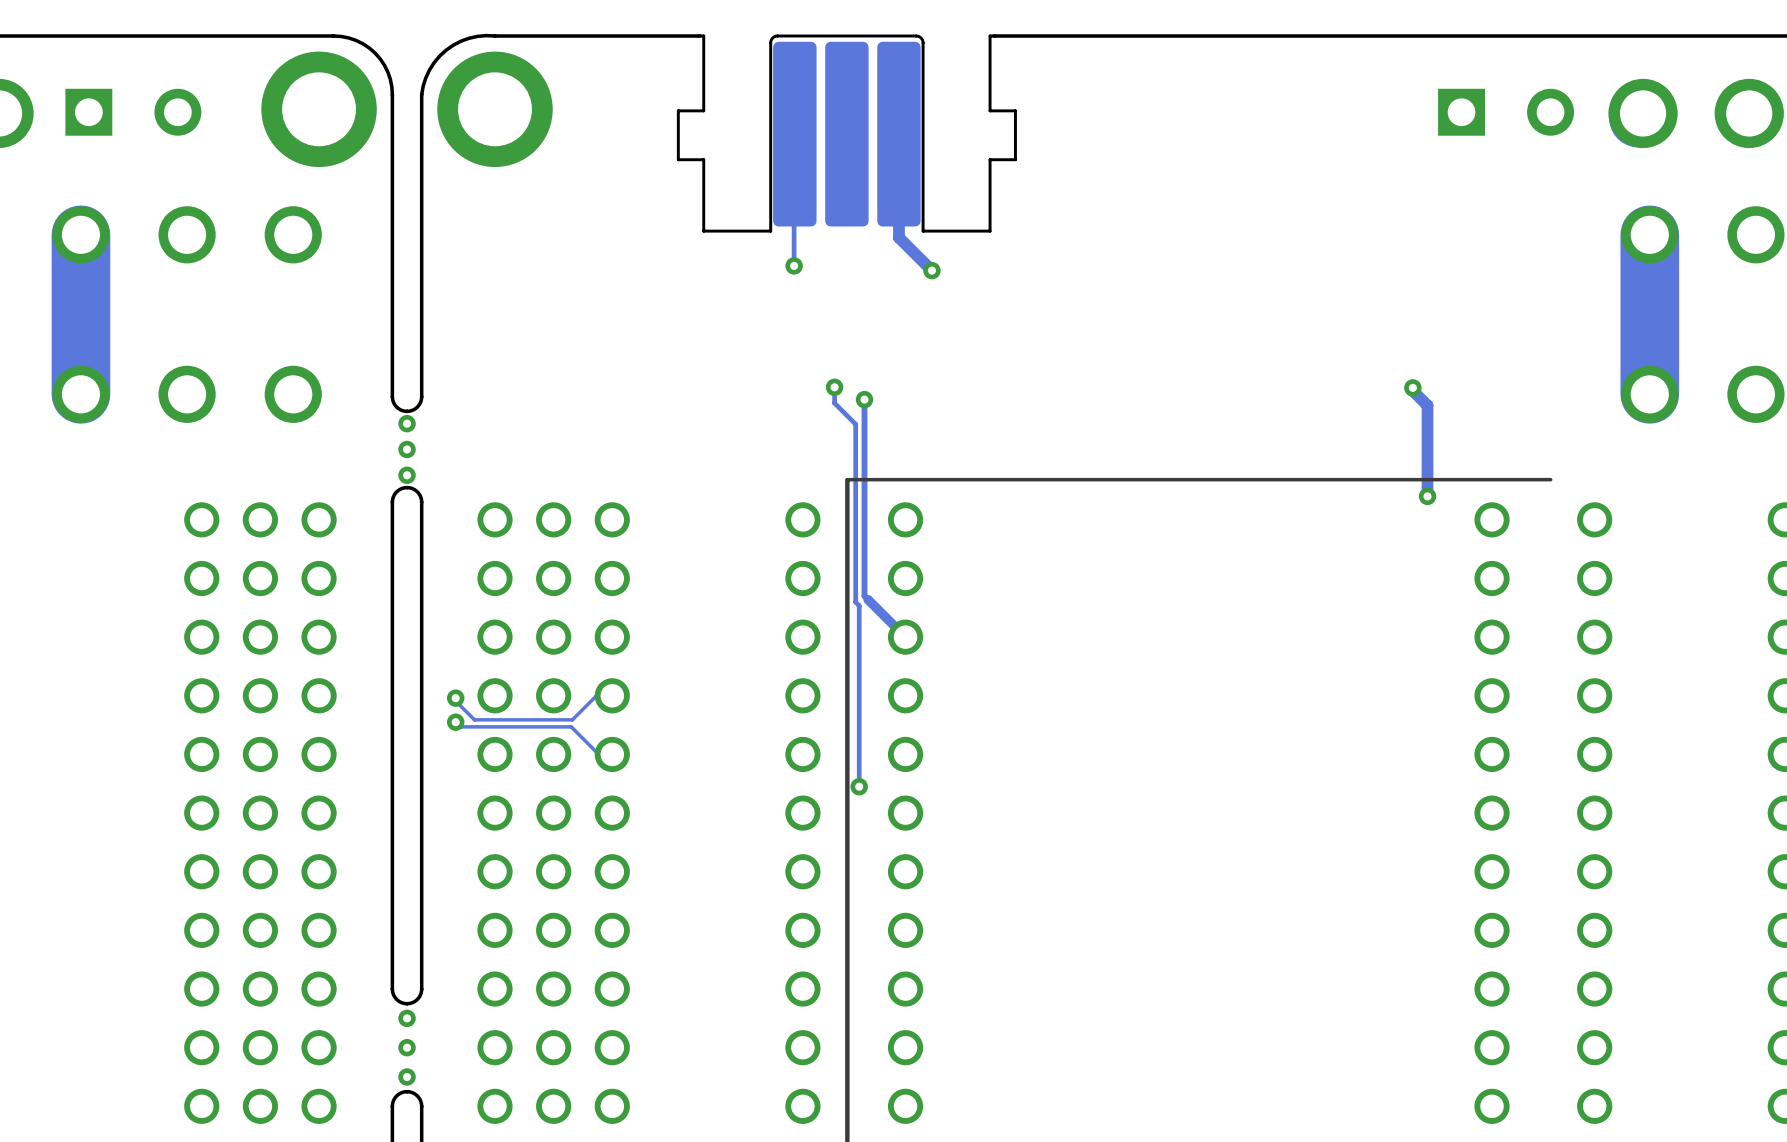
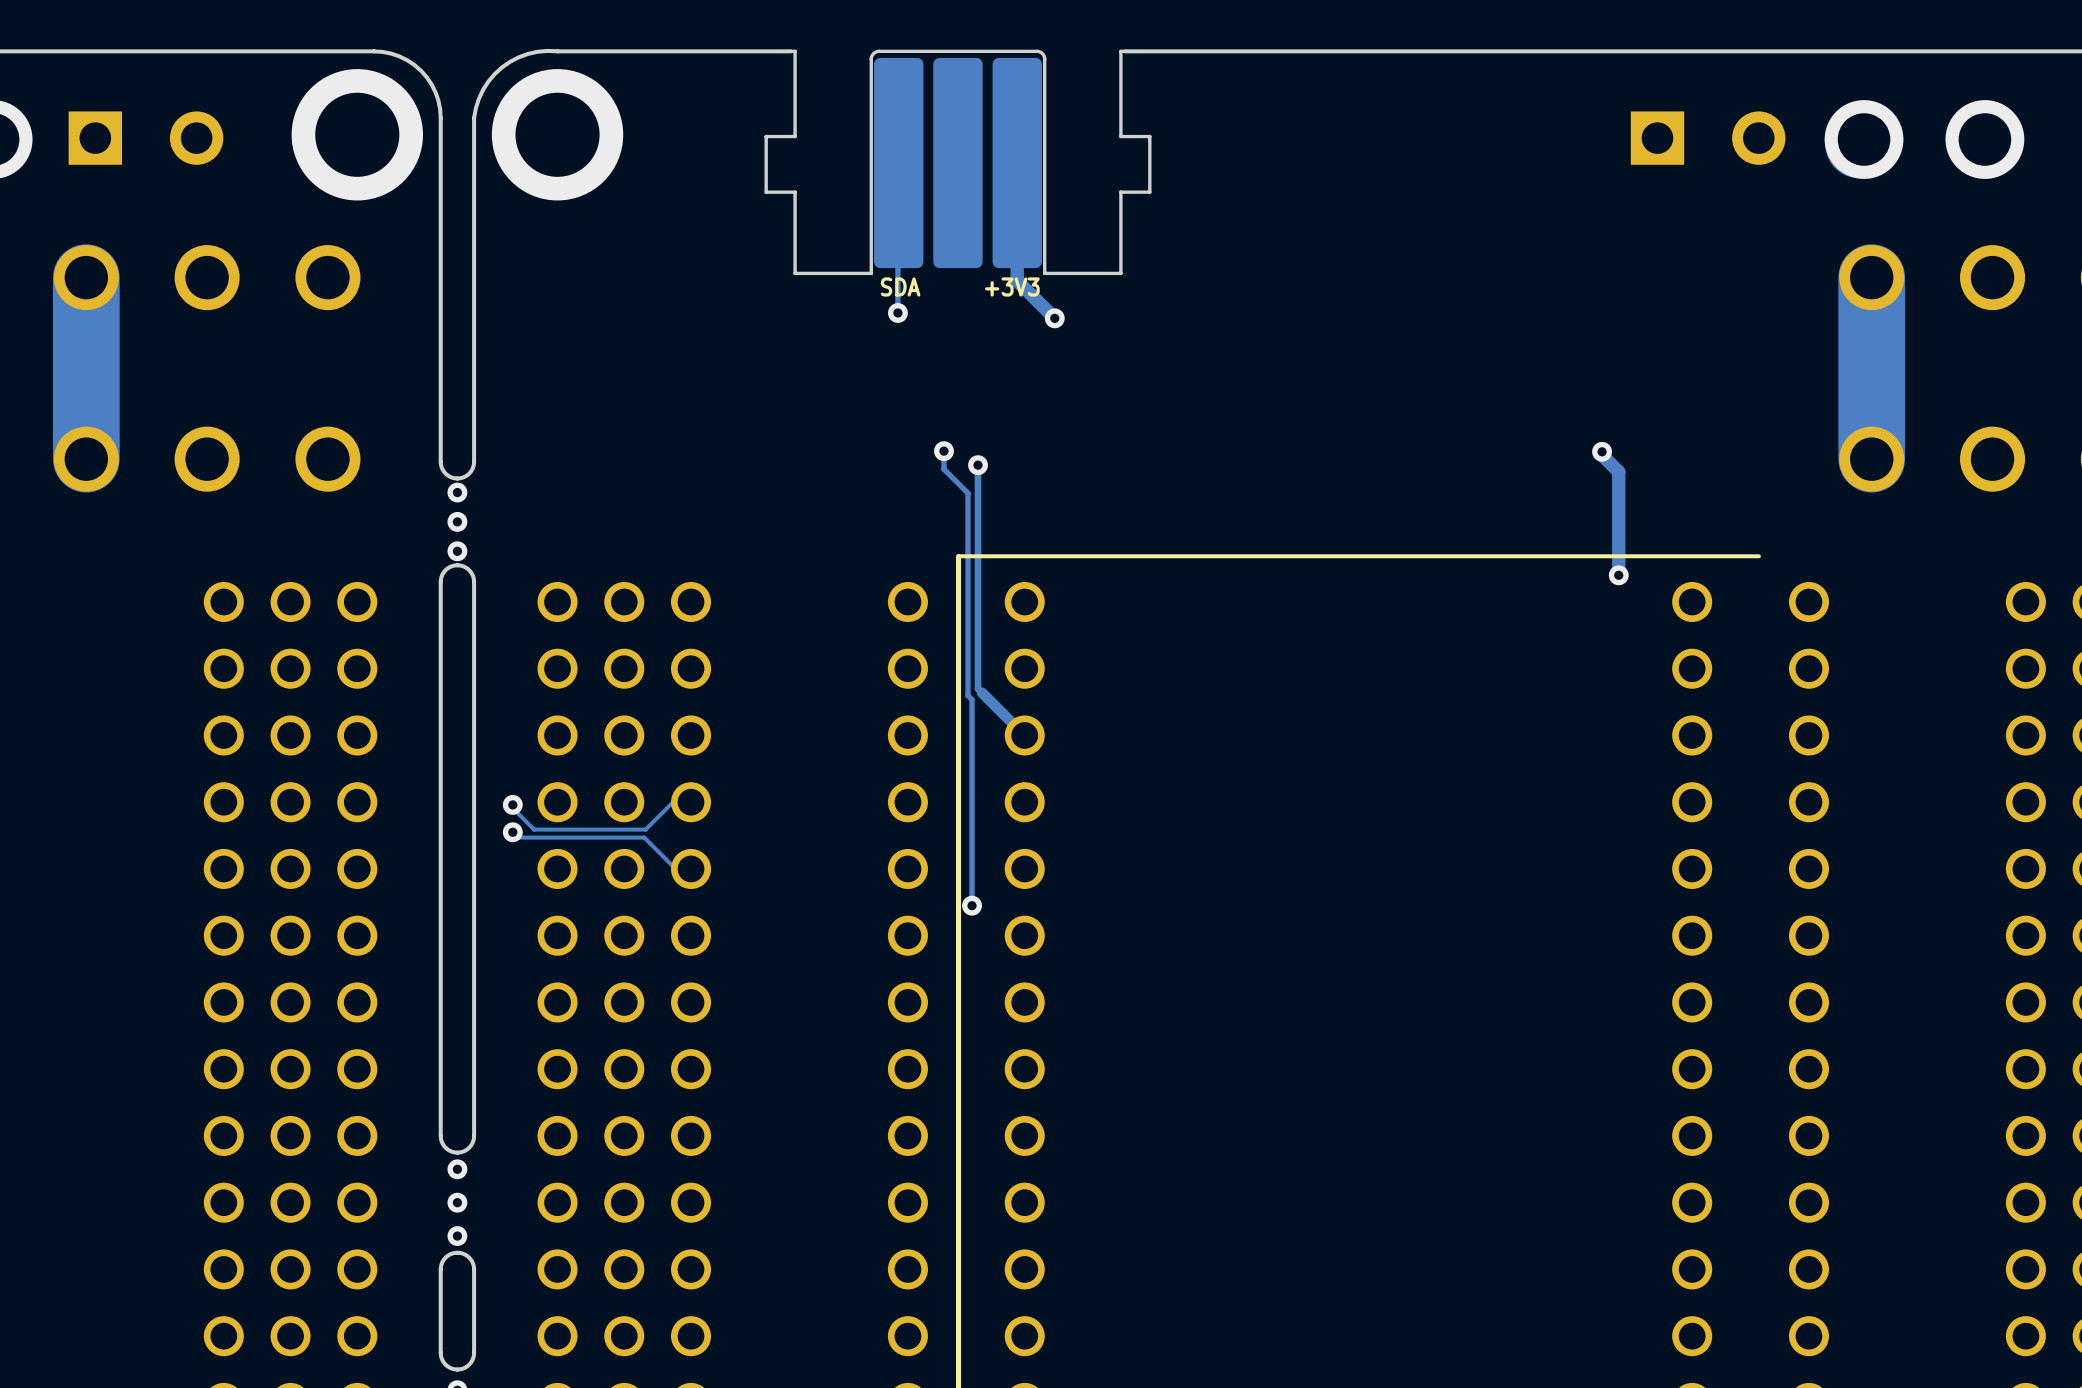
text: none -> SDA (900, 286)
text: none -> +3V3 (1012, 286)

